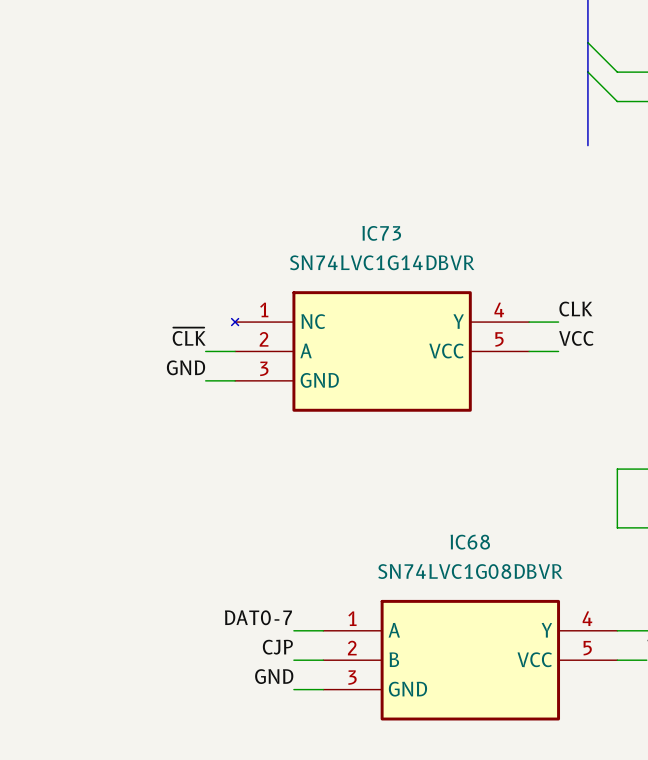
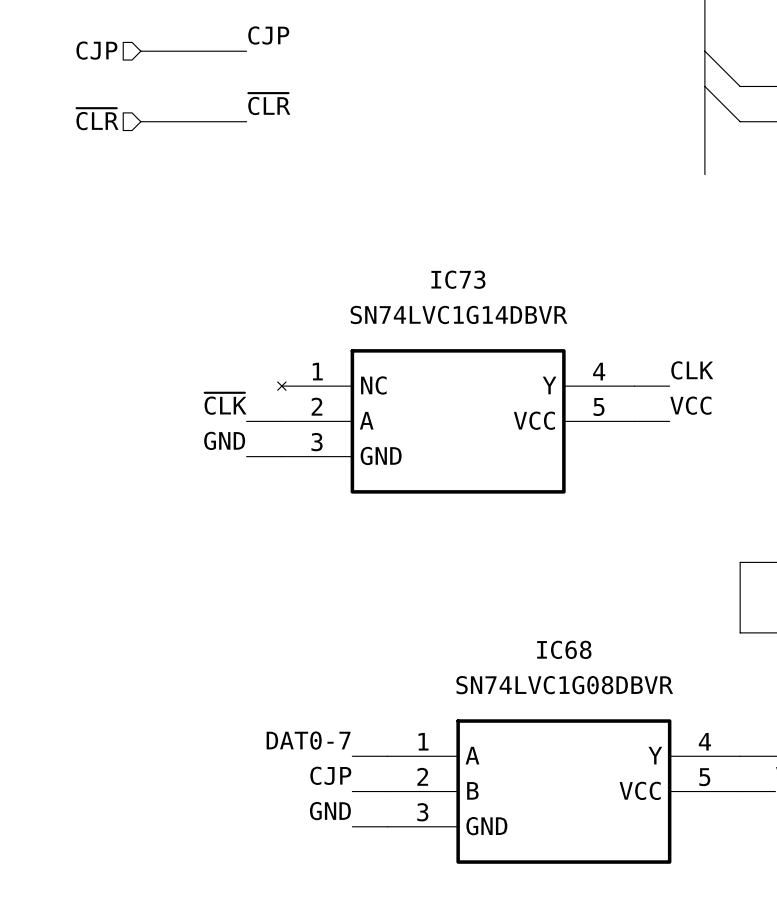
label: none -> CJP (268, 35)
hierarchical label: none -> CJP (96, 50)
wire: none -> (140, 51) (246, 51)
label: none -> ~{CLR} (269, 104)
hierarchical label: none -> ~{CLR} (97, 119)
wire: none -> (140, 121) (246, 121)

